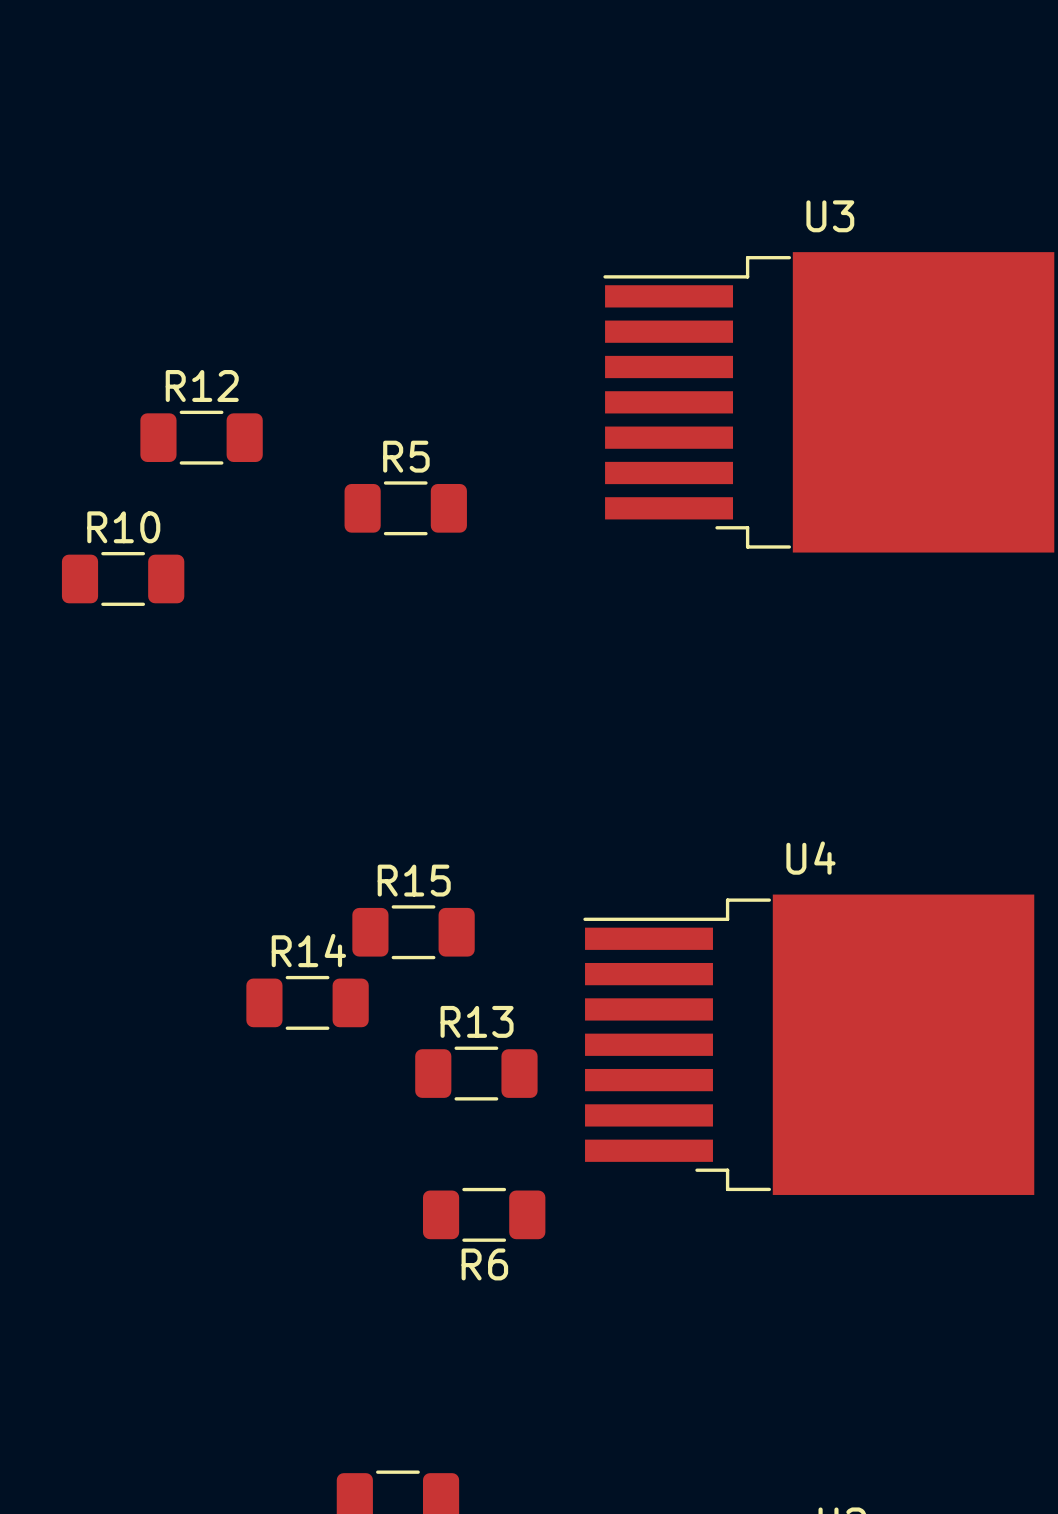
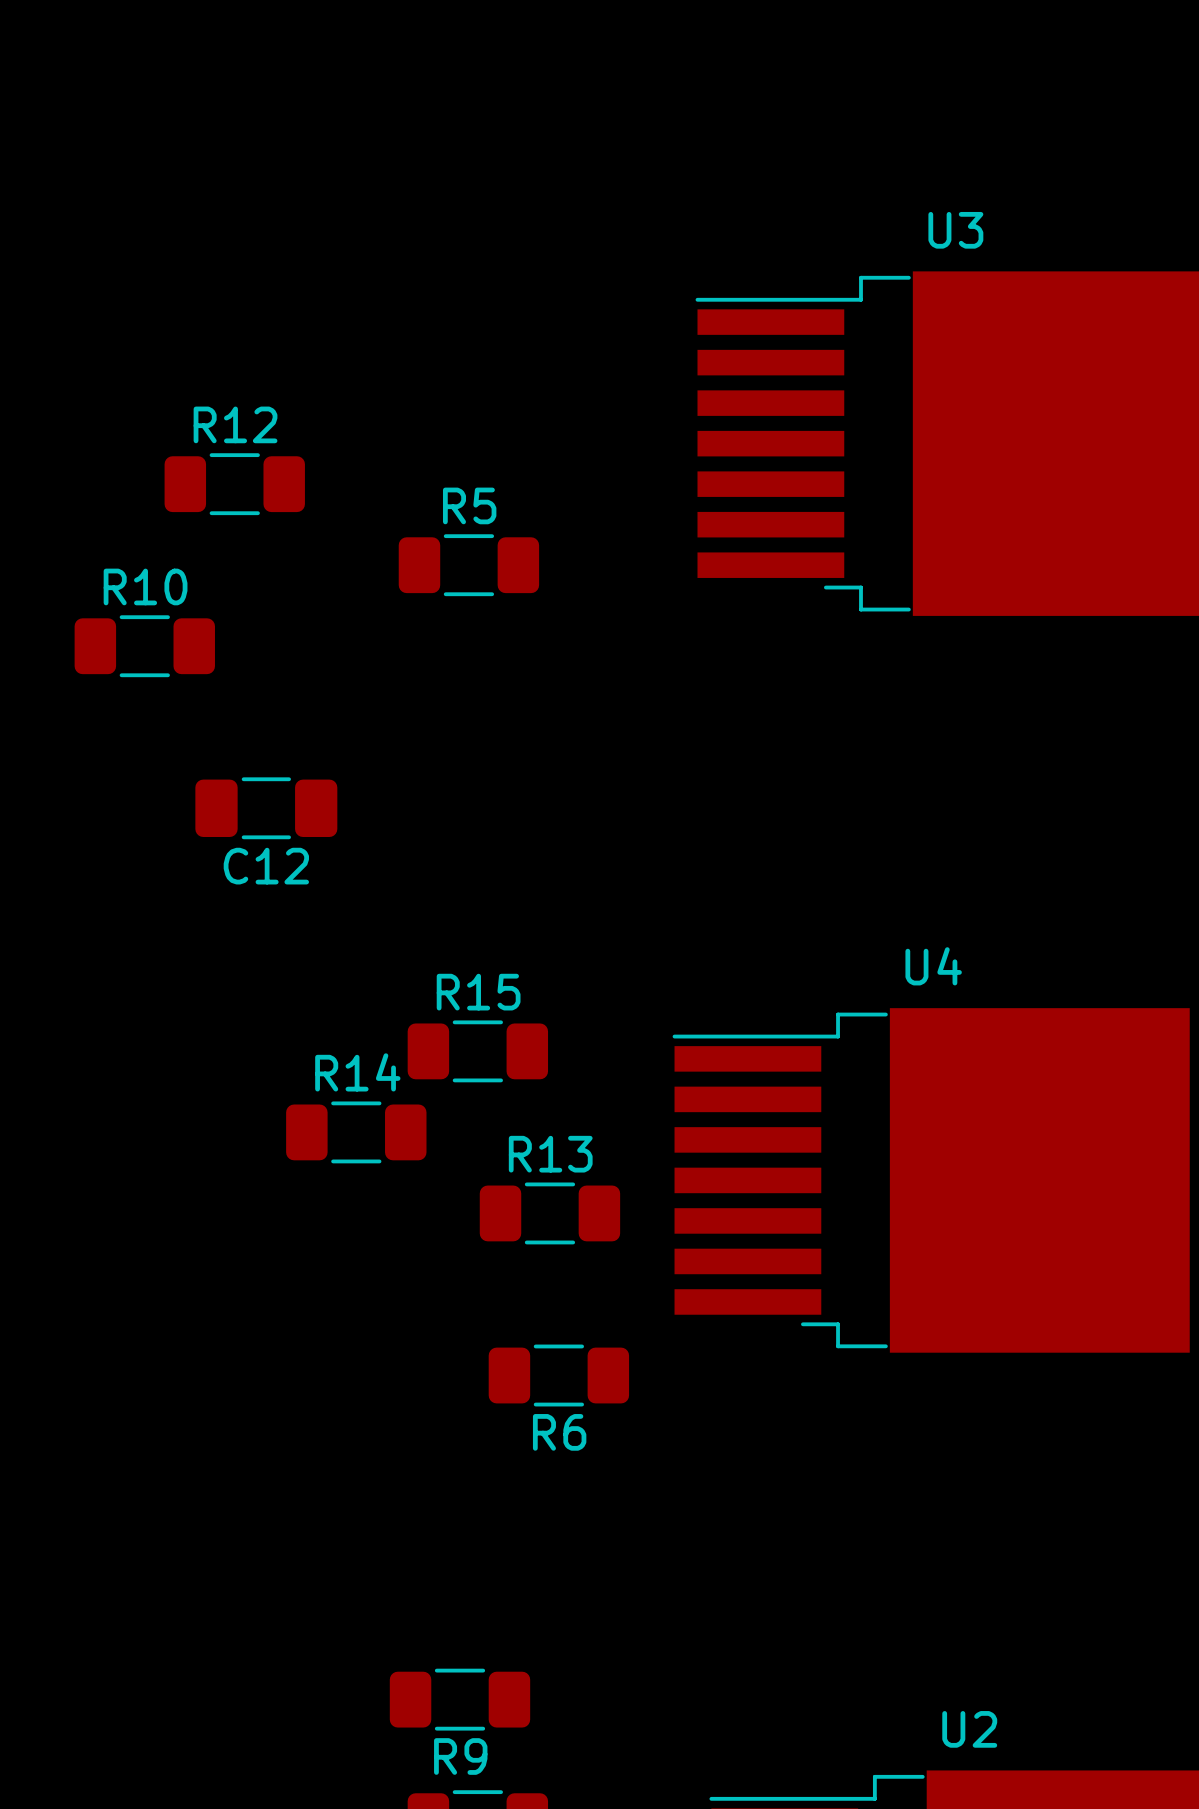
C12: none -> (266, 808)

